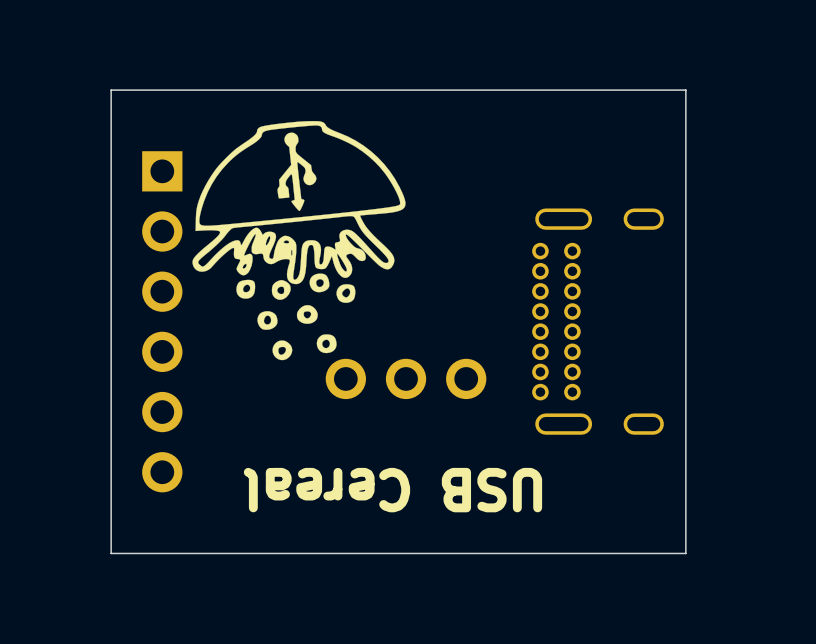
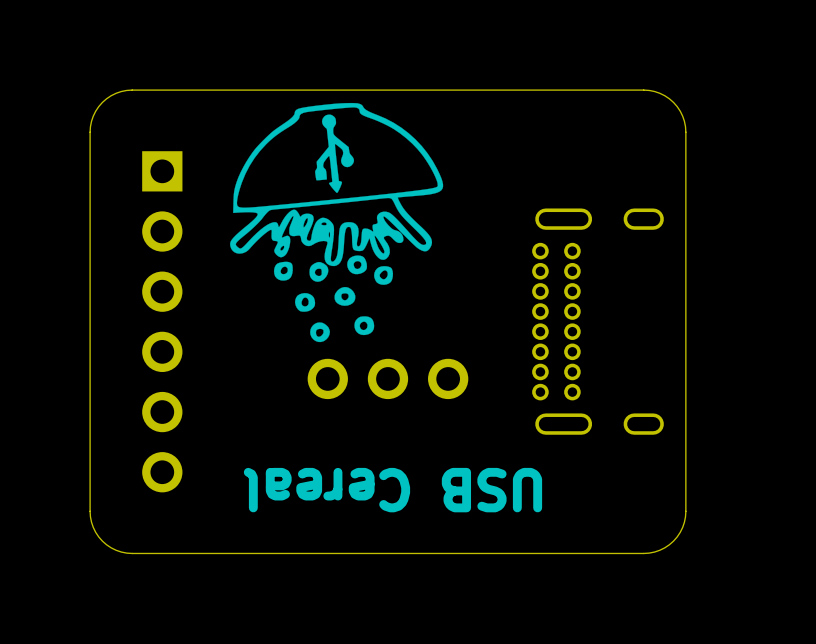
board edge: (132, 90) (111, 90) (111, 553) (132, 553) -> (132, 90) (116, 93) (102, 102) (93, 116) (90, 132) (90, 516) (93, 527) (102, 541) (116, 550) (132, 553)
board edge: (643, 90) (685, 90) (685, 132) -> (643, 90) (659, 93) (673, 102) (682, 116) (685, 132)
drawing position: (298, 240) -> (336, 222)
part position: (406, 378) -> (387, 378)
board edge: (685, 511) (685, 553) (643, 553) -> (685, 511) (682, 527) (673, 541) (659, 550) (643, 553)

